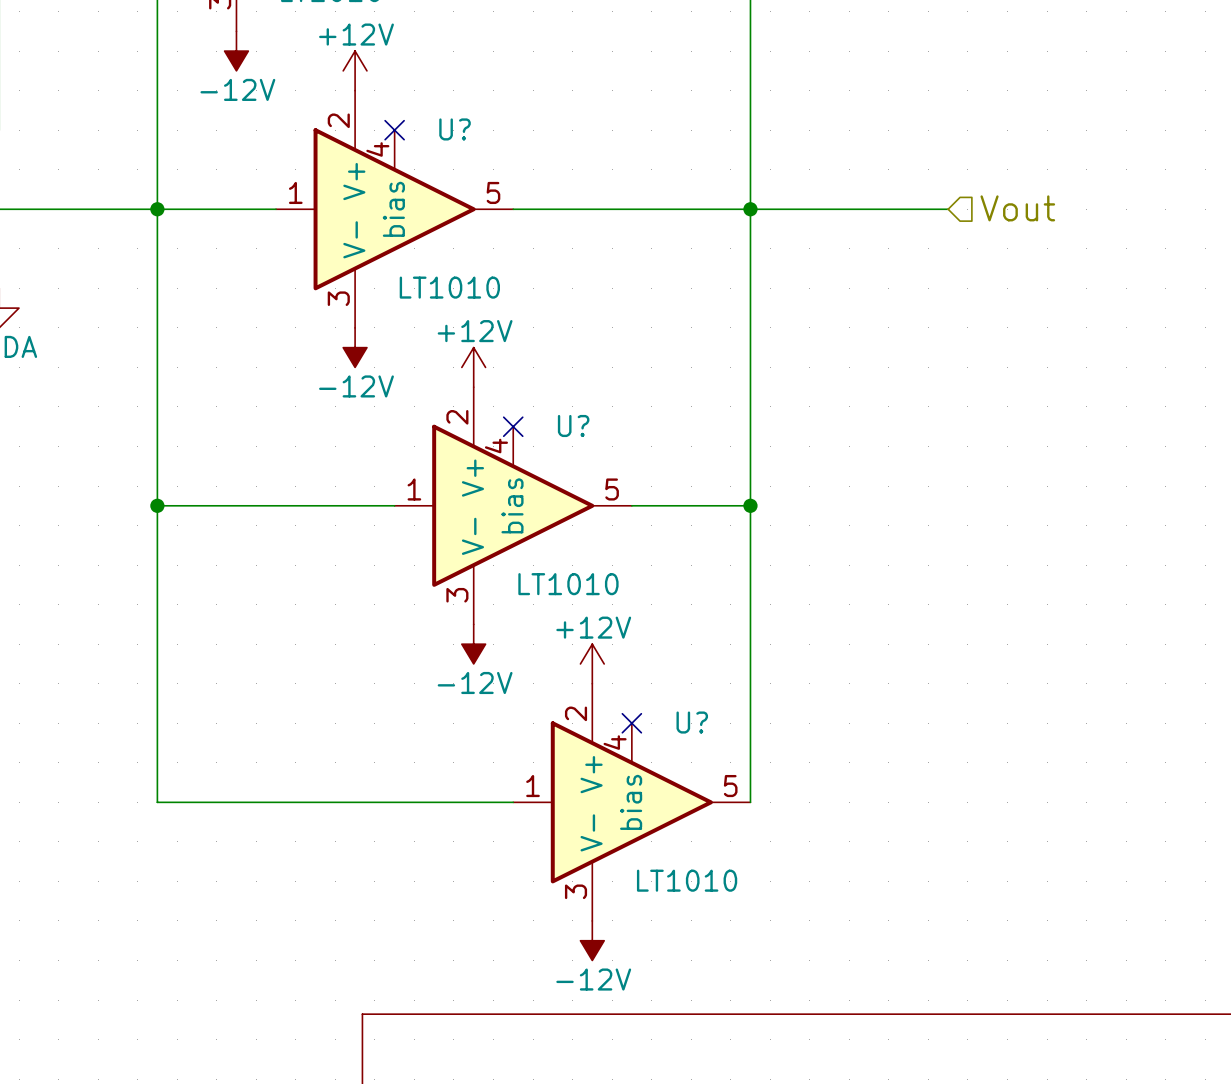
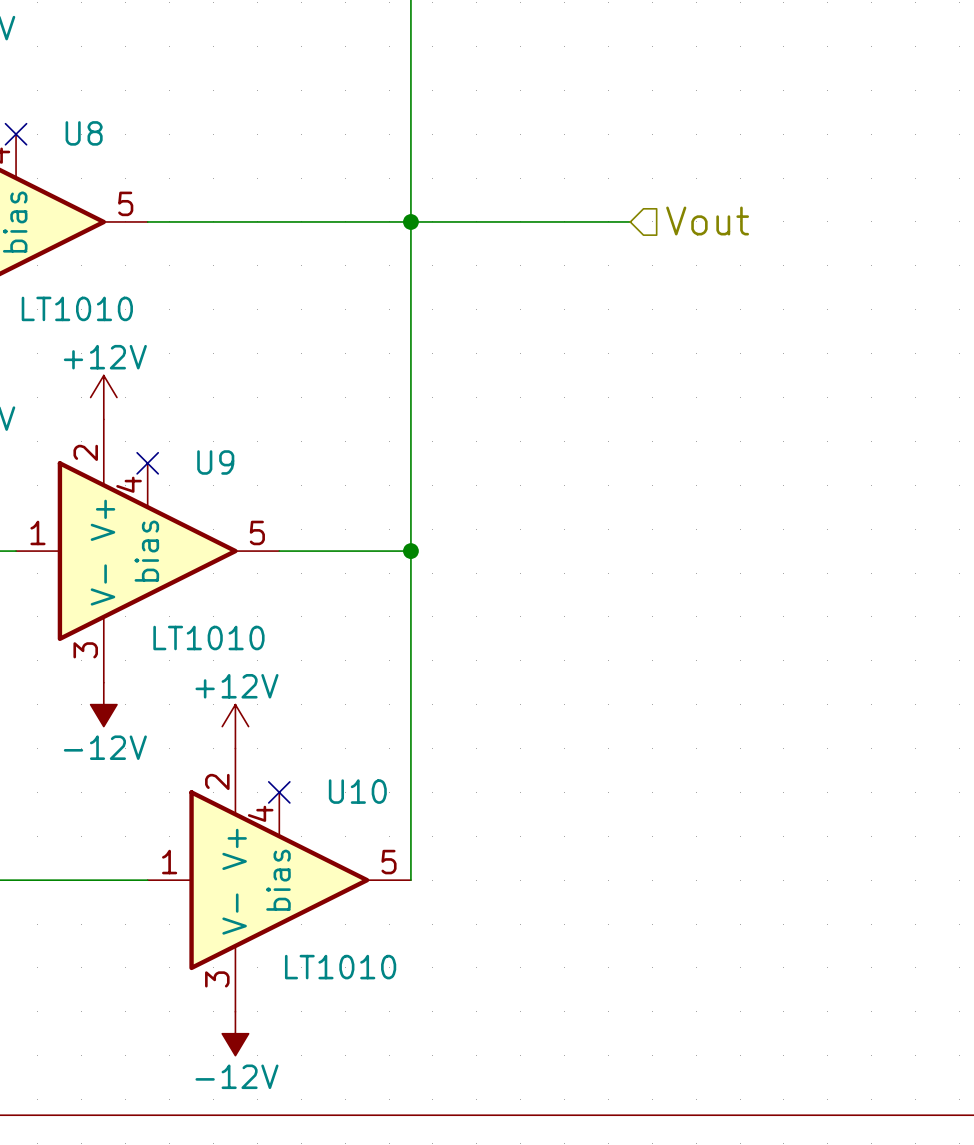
U? name: U? (455, 129) -> U8 (84, 133)
U? name: U? (573, 425) -> U9 (215, 462)
U? name: U? (692, 722) -> U10 (357, 791)

